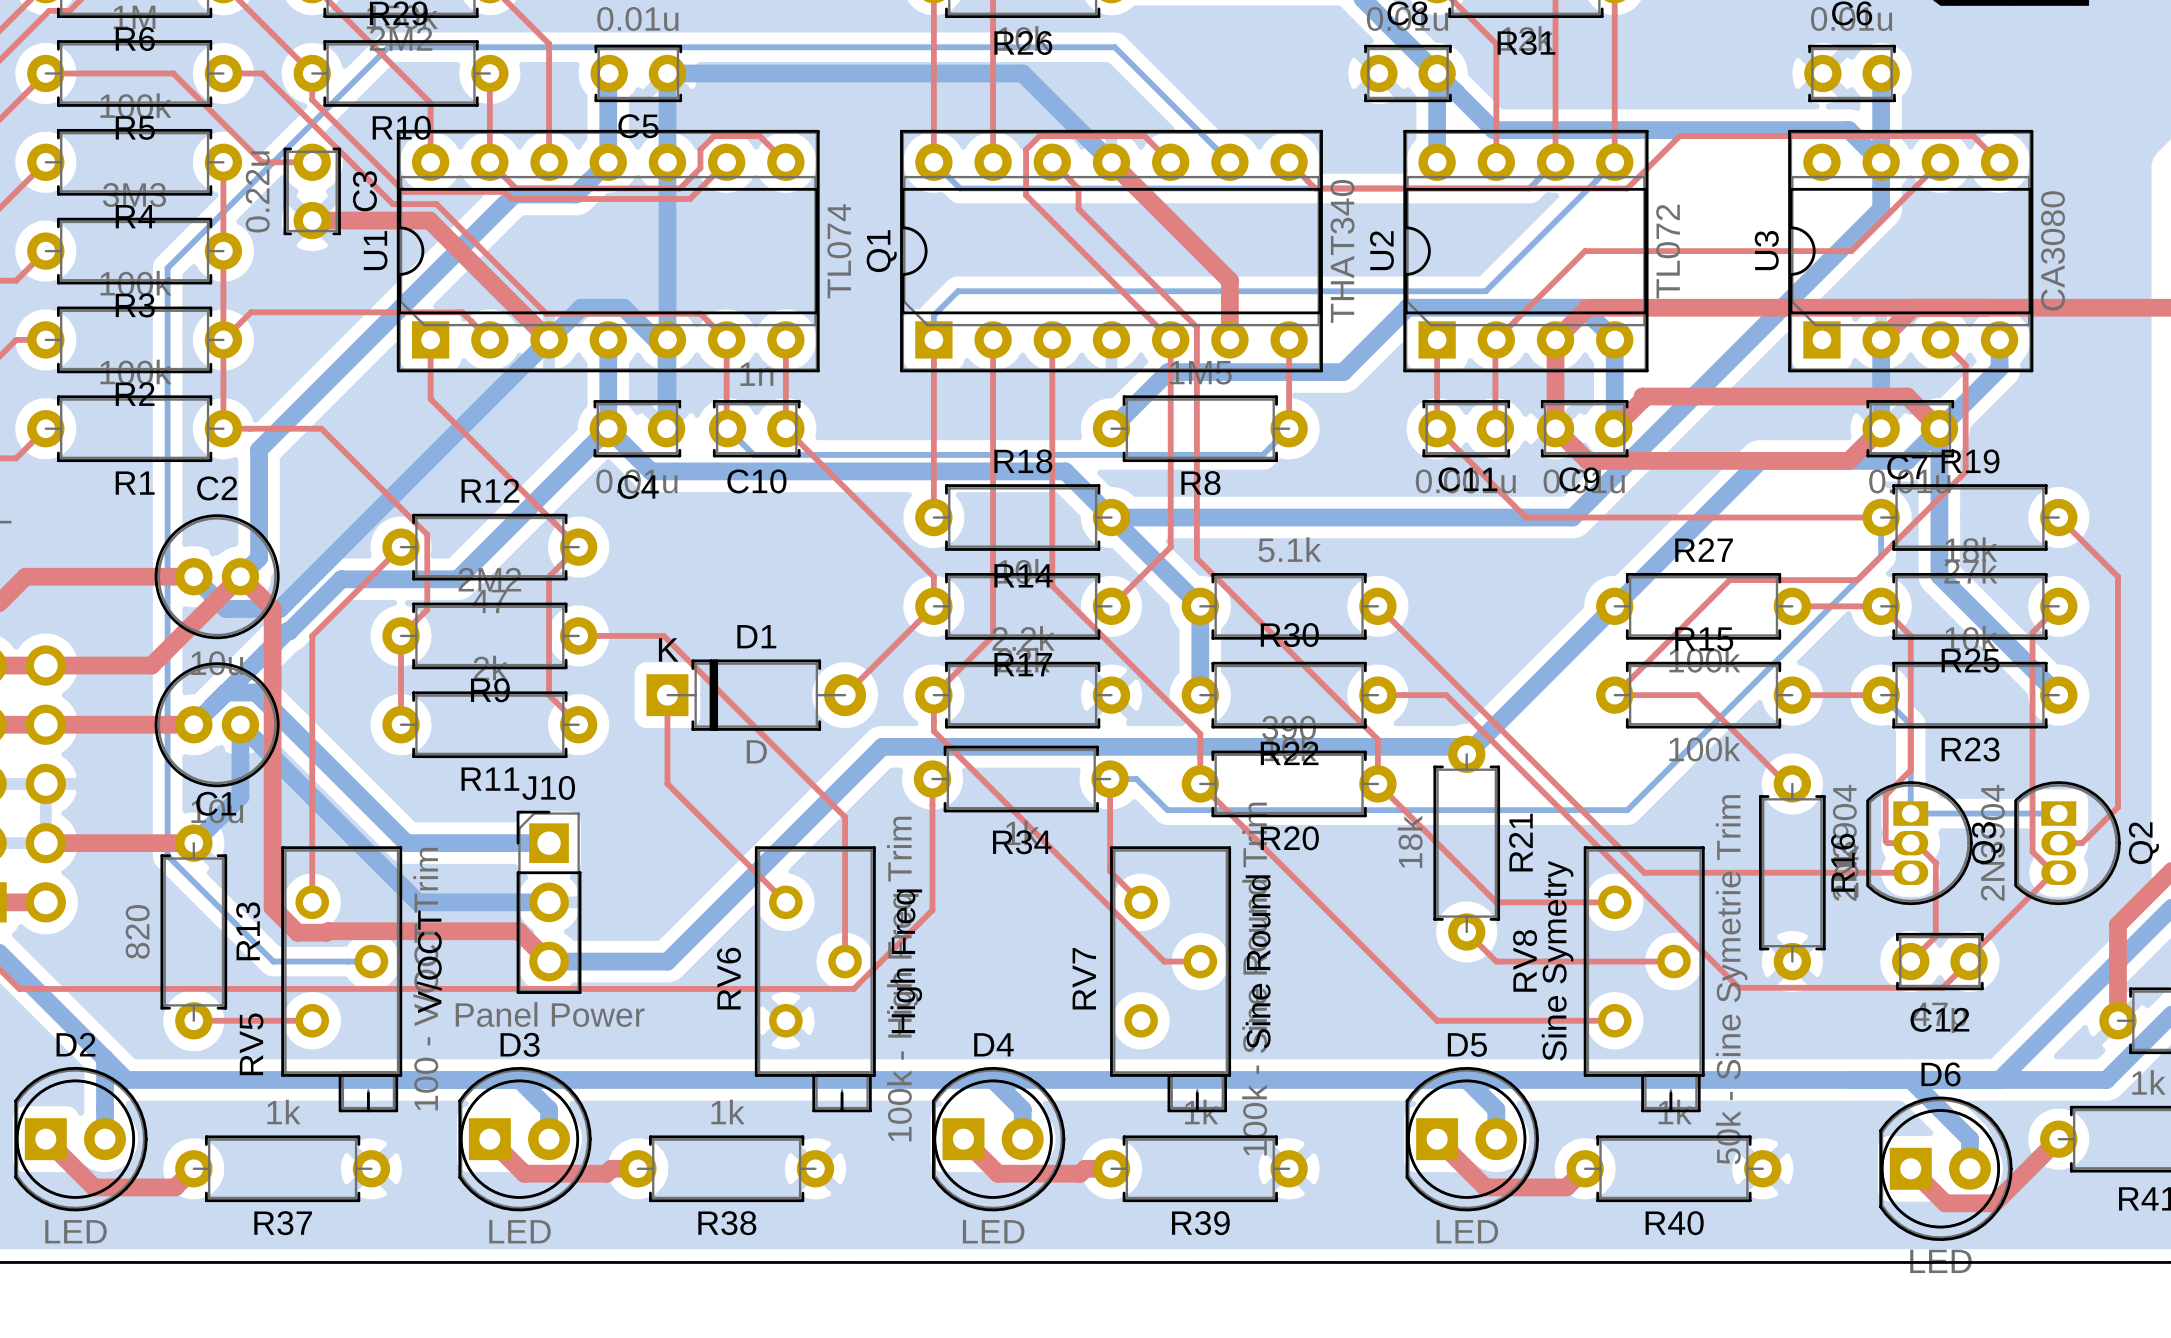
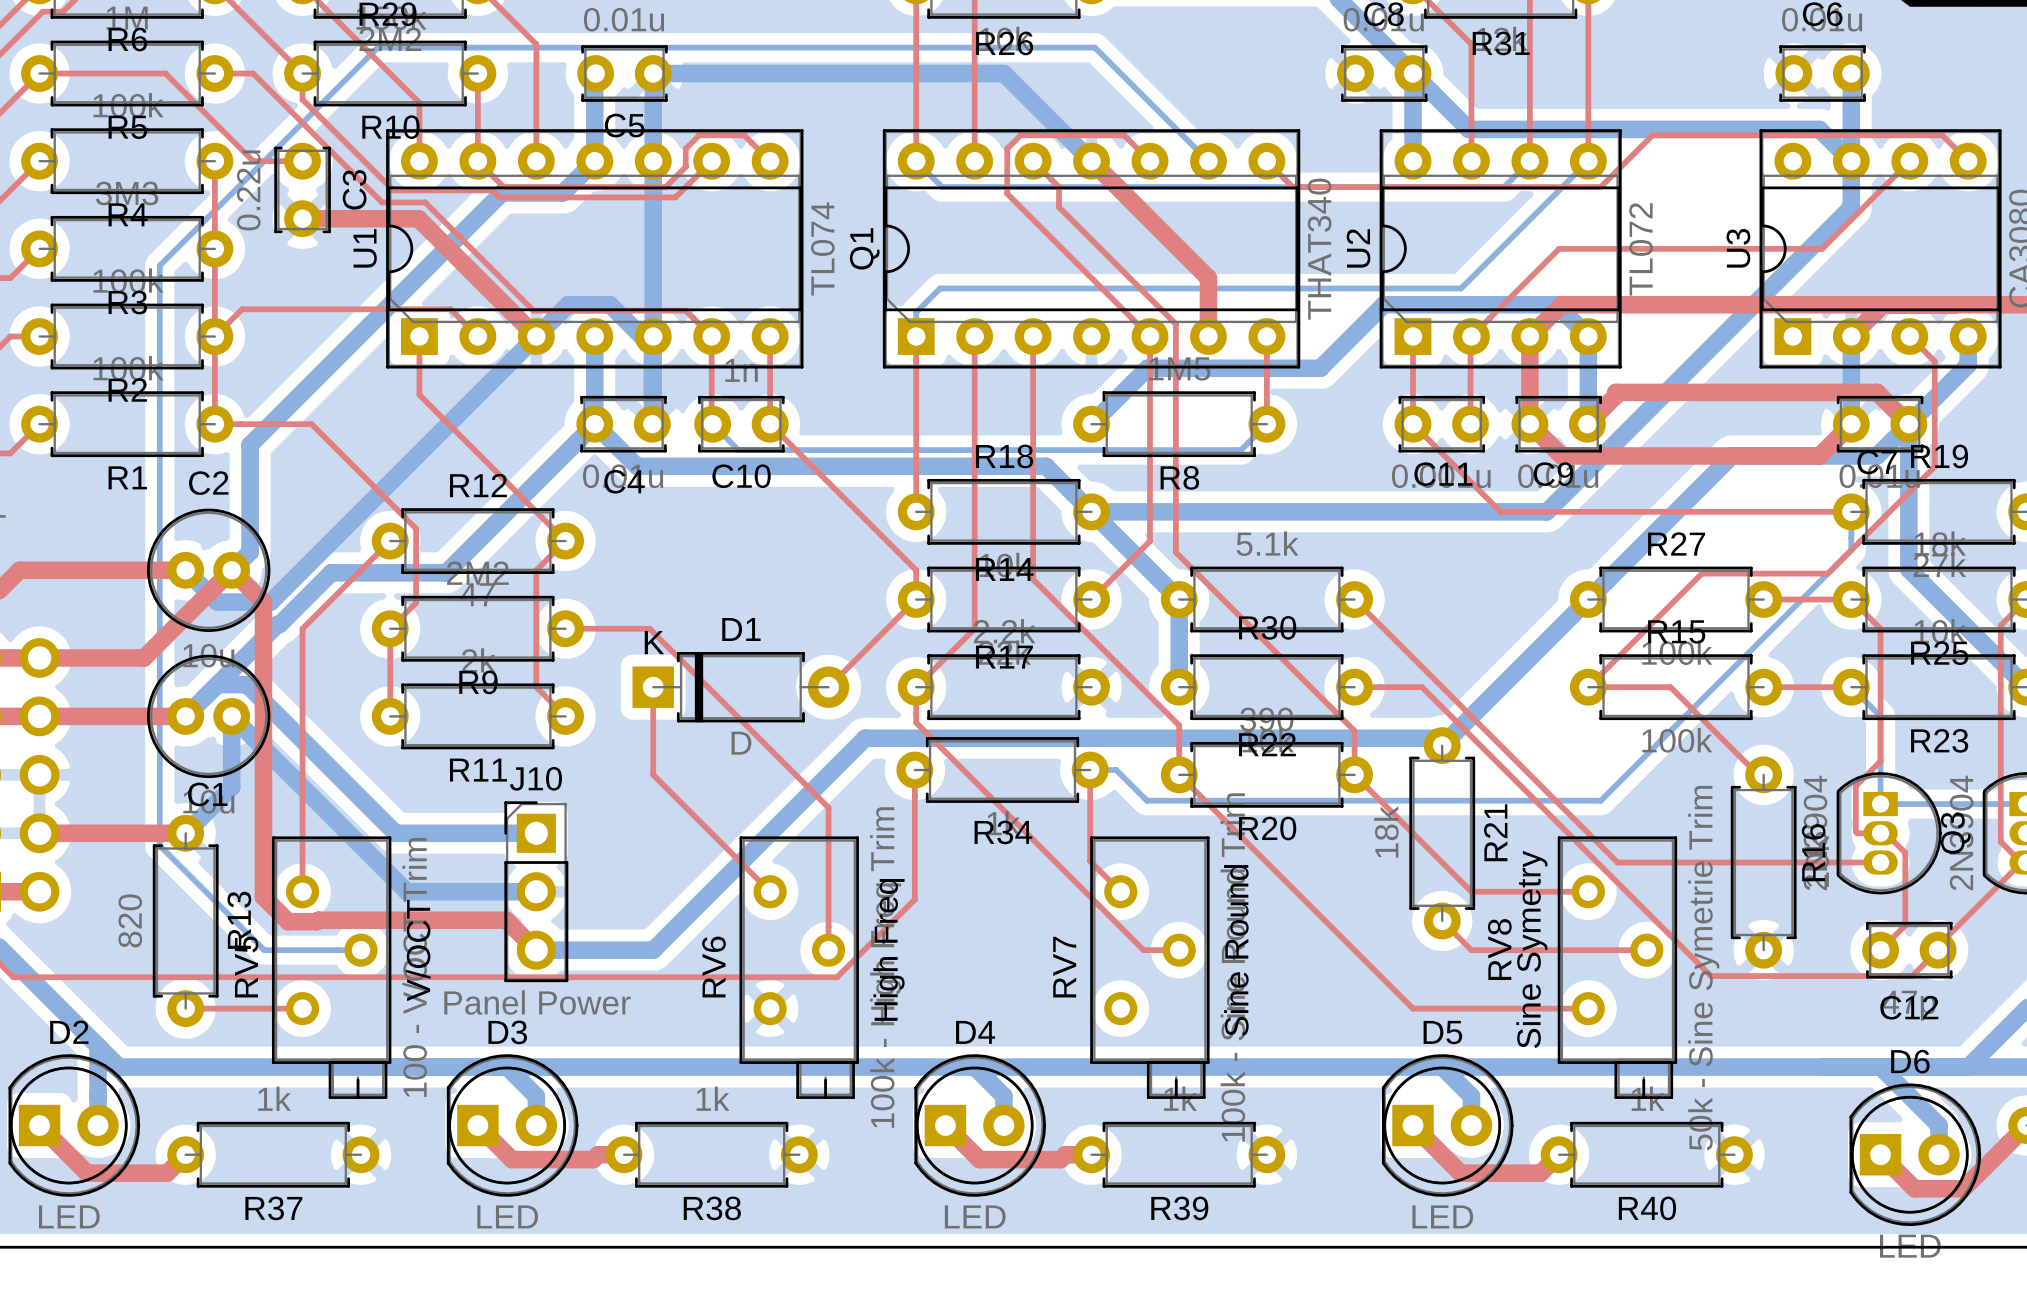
RV5 name position: RV5 (251, 1044) -> RV5 (246, 967)

